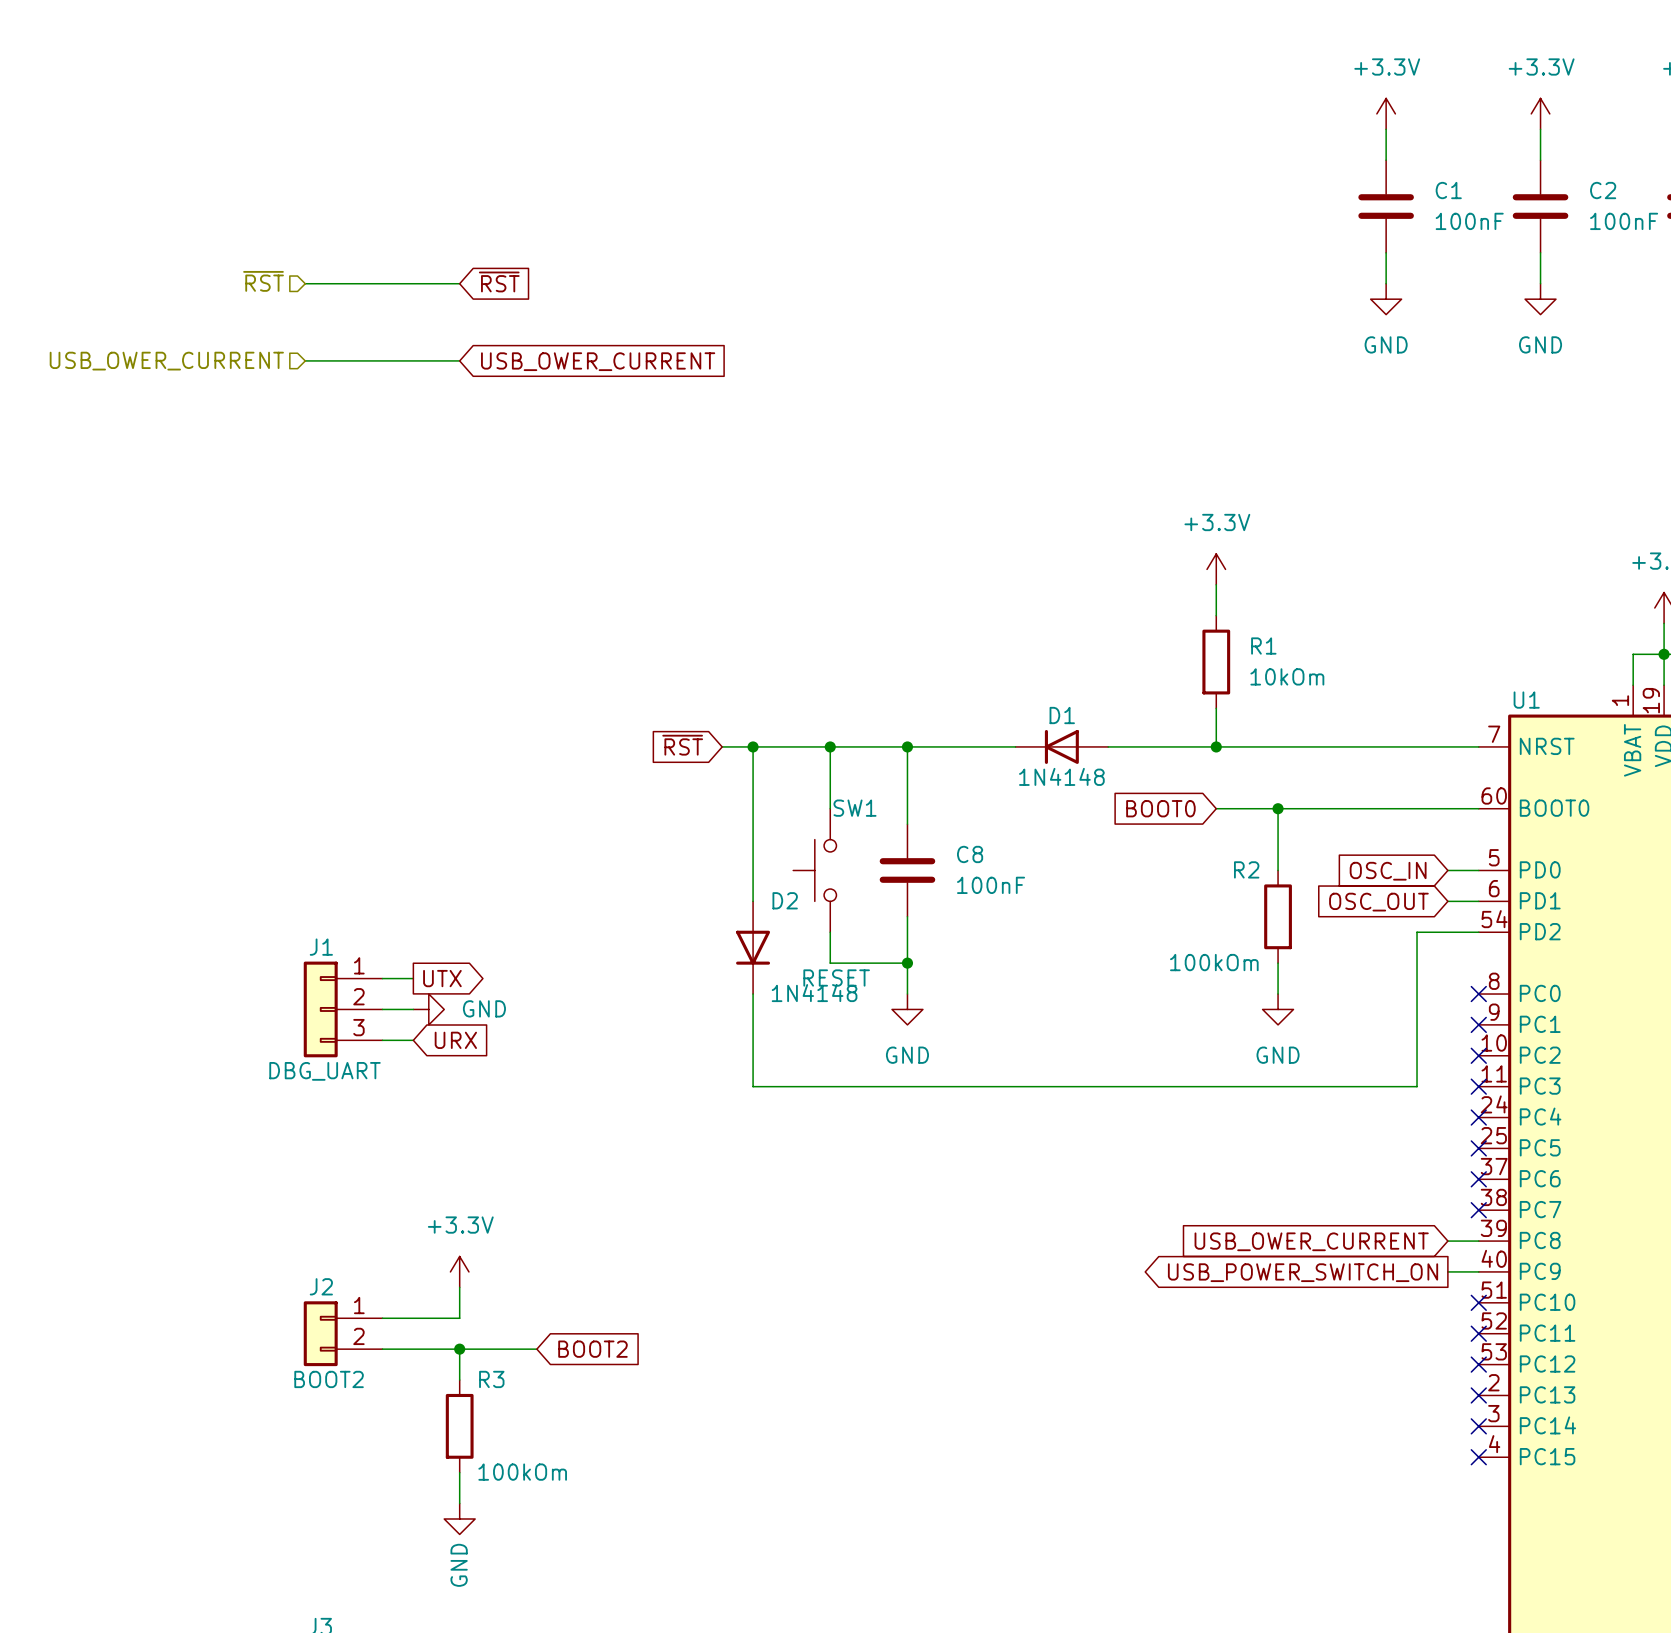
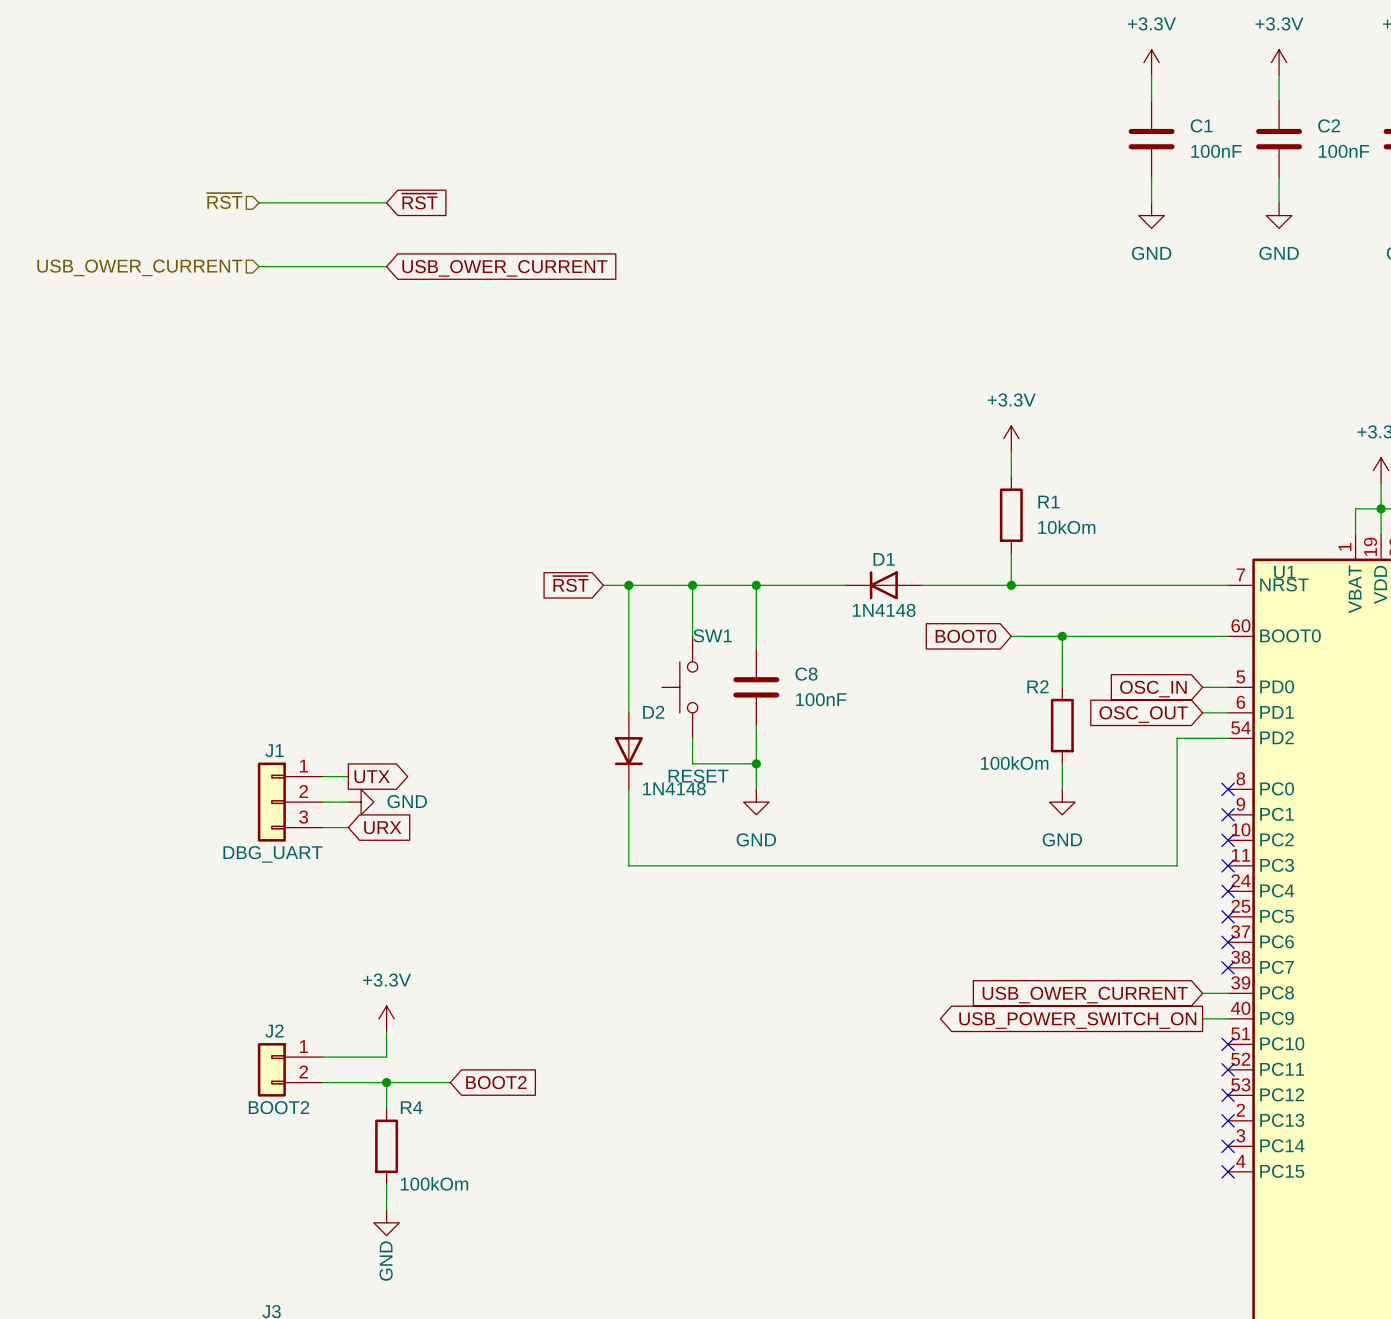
U1 name position: U1 (1526, 700) -> U1 (1284, 572)
R3 name: R3 (491, 1379) -> R4 (411, 1107)

